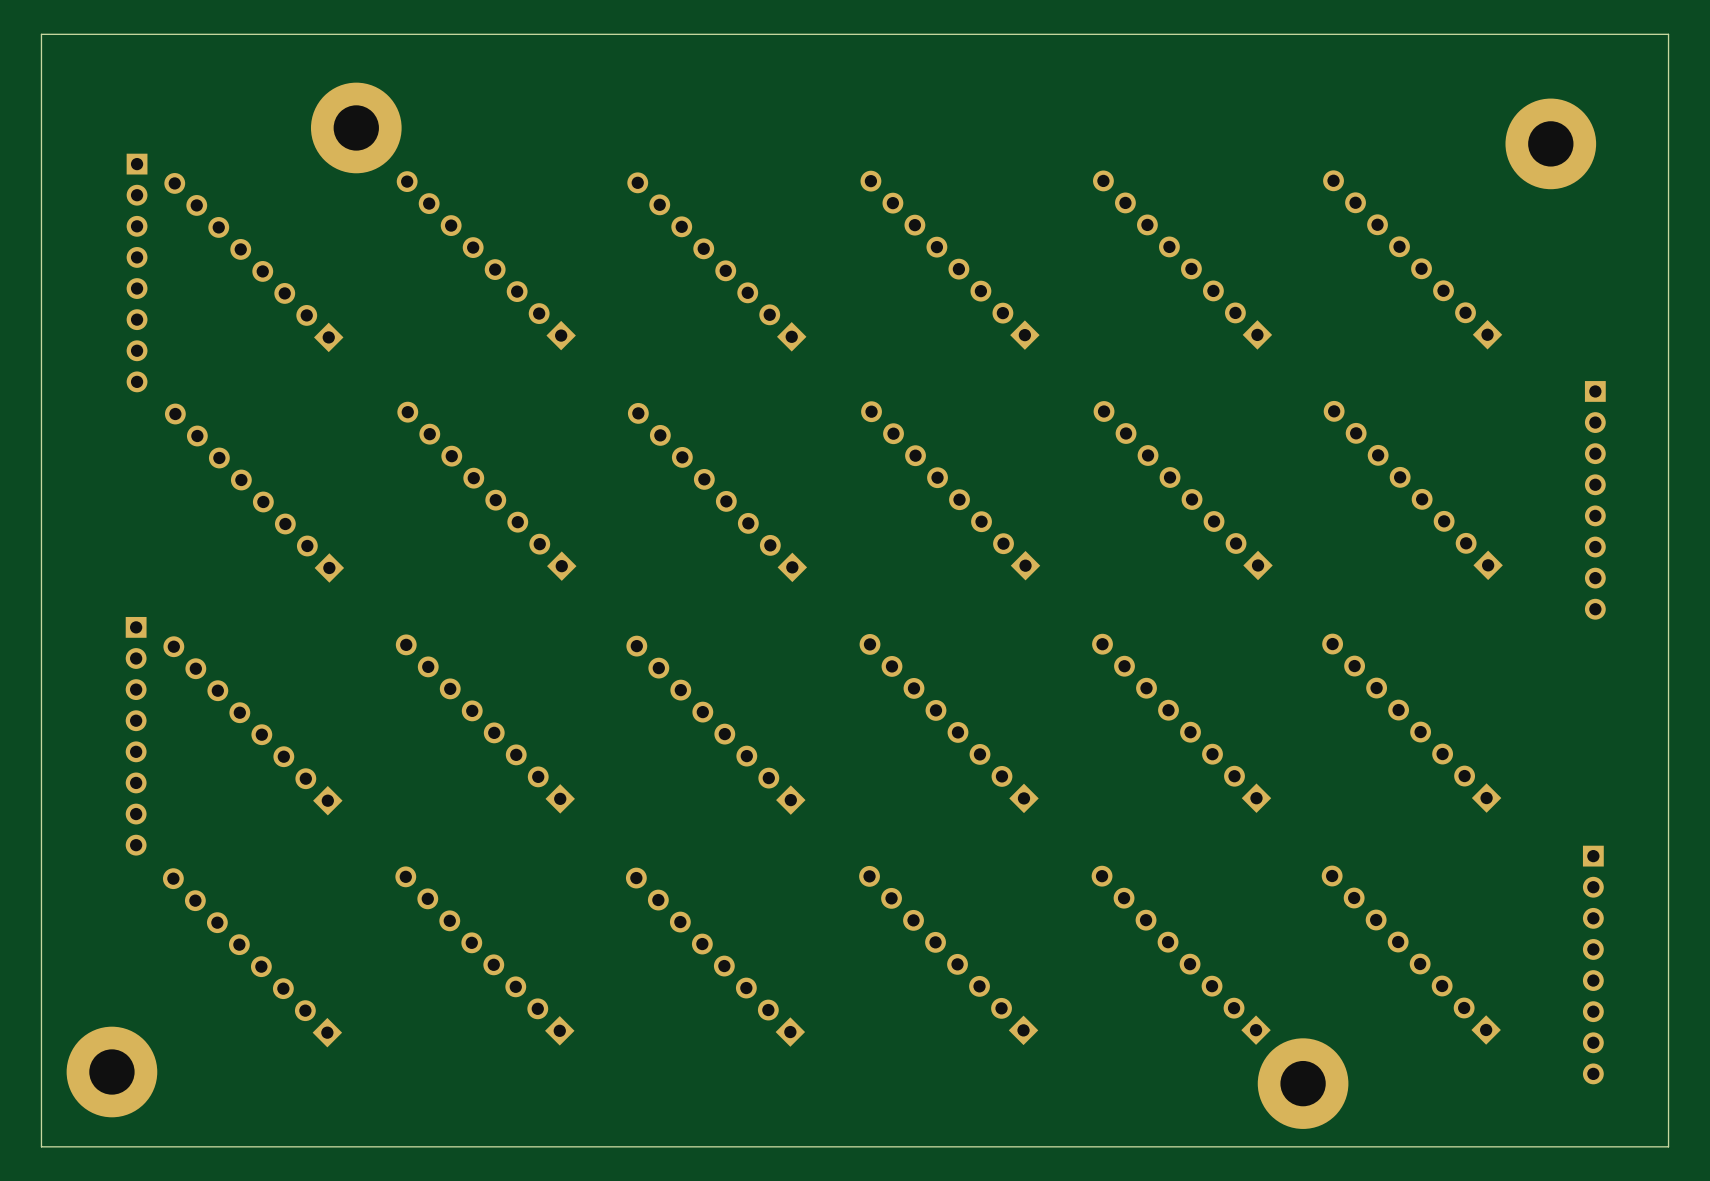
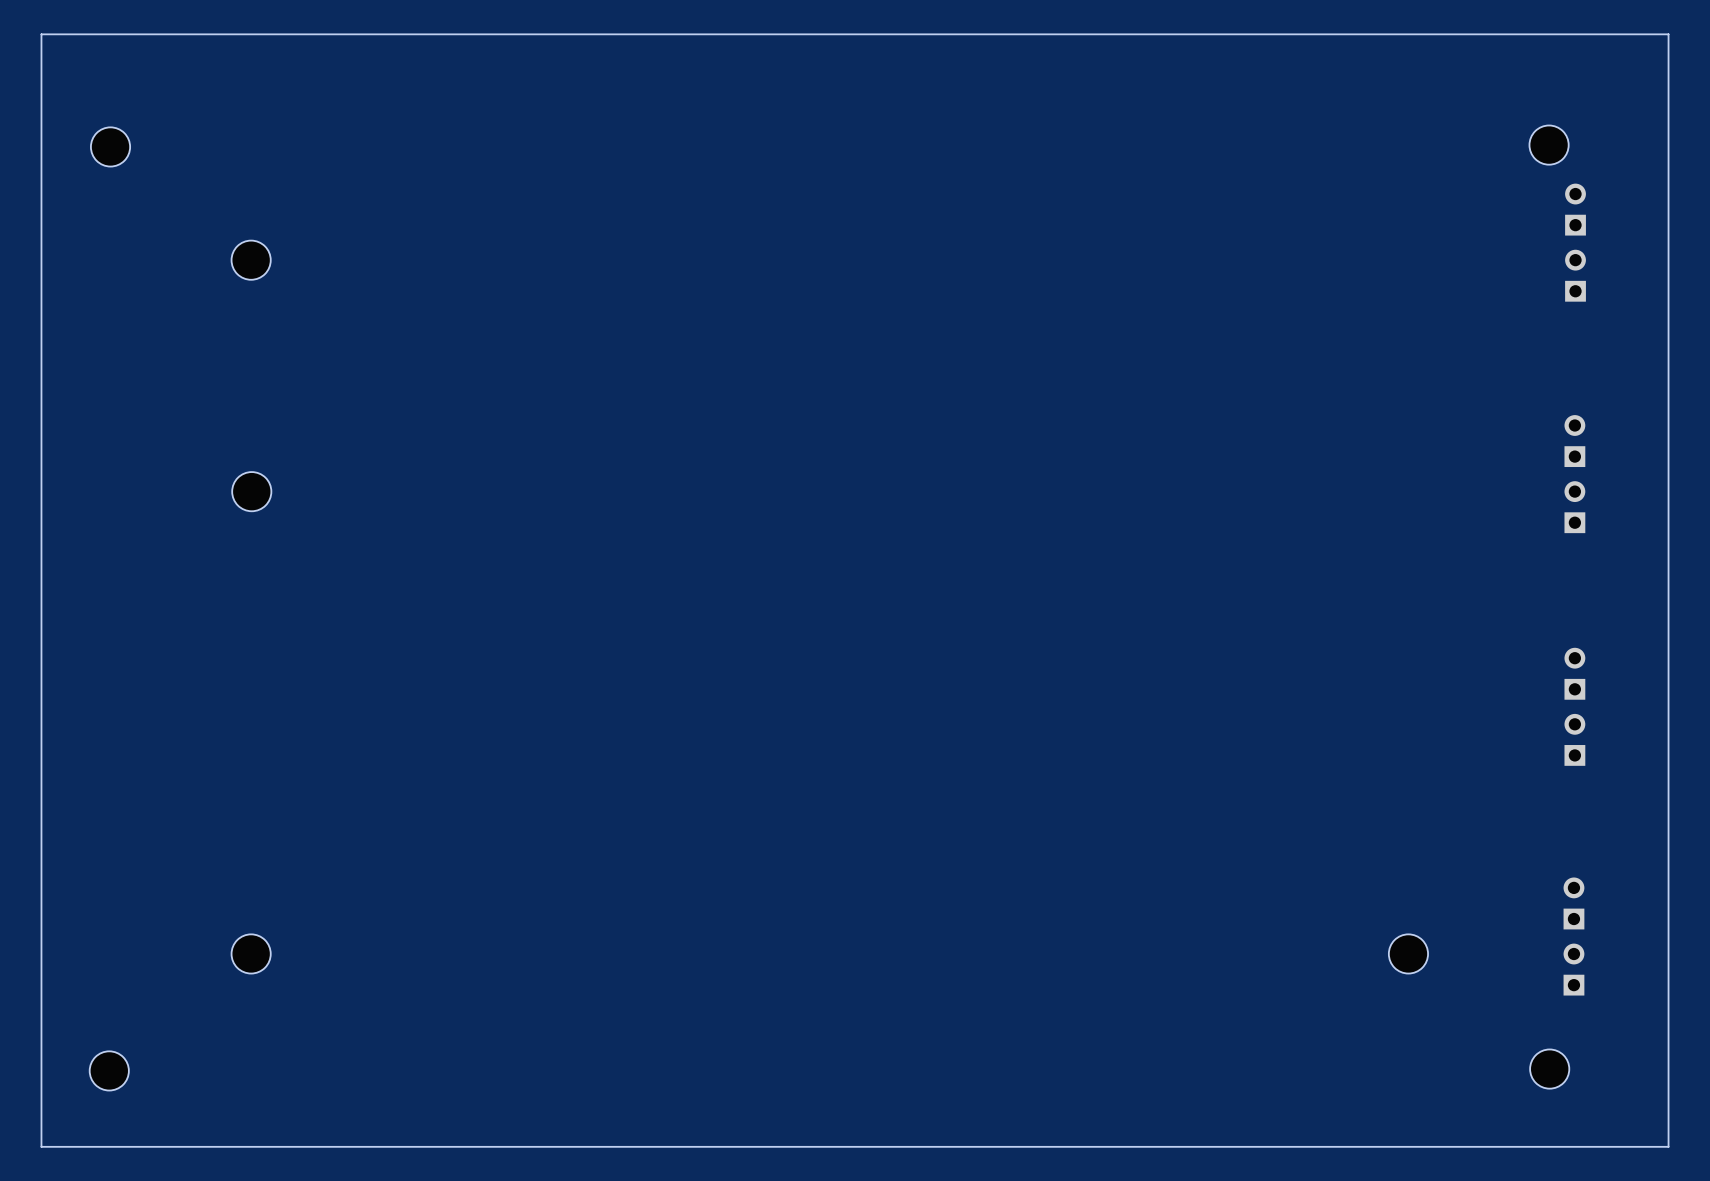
part footprint: [1505, 98, 1597, 190] -> [1529, 125, 1569, 165]
part: (356, 127) -> none
part: none -> (110, 146)
part footprint: [164, 173, 344, 353] -> [231, 240, 271, 280]
part: none -> (1575, 209)
part: (1412, 259) -> none
part: (486, 260) -> none
part: (950, 260) -> none
part: (1182, 260) -> none
part: (716, 261) -> none
part: (137, 272) -> none
part: none -> (1575, 275)
part footprint: [164, 403, 345, 583] -> [232, 472, 272, 512]
part: none -> (1574, 441)
part: (950, 490) -> none
part: (1183, 490) -> none
part: (1413, 490) -> none
part: (486, 491) -> none
part: (717, 492) -> none
part: (1595, 500) -> none
part: none -> (1574, 507)
part: none -> (1574, 673)
part: (949, 723) -> none
part: (1181, 723) -> none
part: (1411, 723) -> none
part: (485, 724) -> none
part: (252, 725) -> none
part: (715, 725) -> none
part: (136, 736) -> none
part: none -> (1574, 739)
part footprint: [1321, 865, 1501, 1045] -> [1388, 934, 1429, 974]
part footprint: [162, 868, 343, 1048] -> [231, 934, 271, 974]
part: none -> (1573, 903)
part: (484, 955) -> none
part: (948, 955) -> none
part: (1181, 955) -> none
part: (715, 957) -> none
part: (1593, 965) -> none
part: none -> (1573, 969)
part footprint: [66, 1026, 158, 1118] -> [89, 1051, 129, 1091]
part: none -> (1549, 1069)
part: (1303, 1083) -> none

